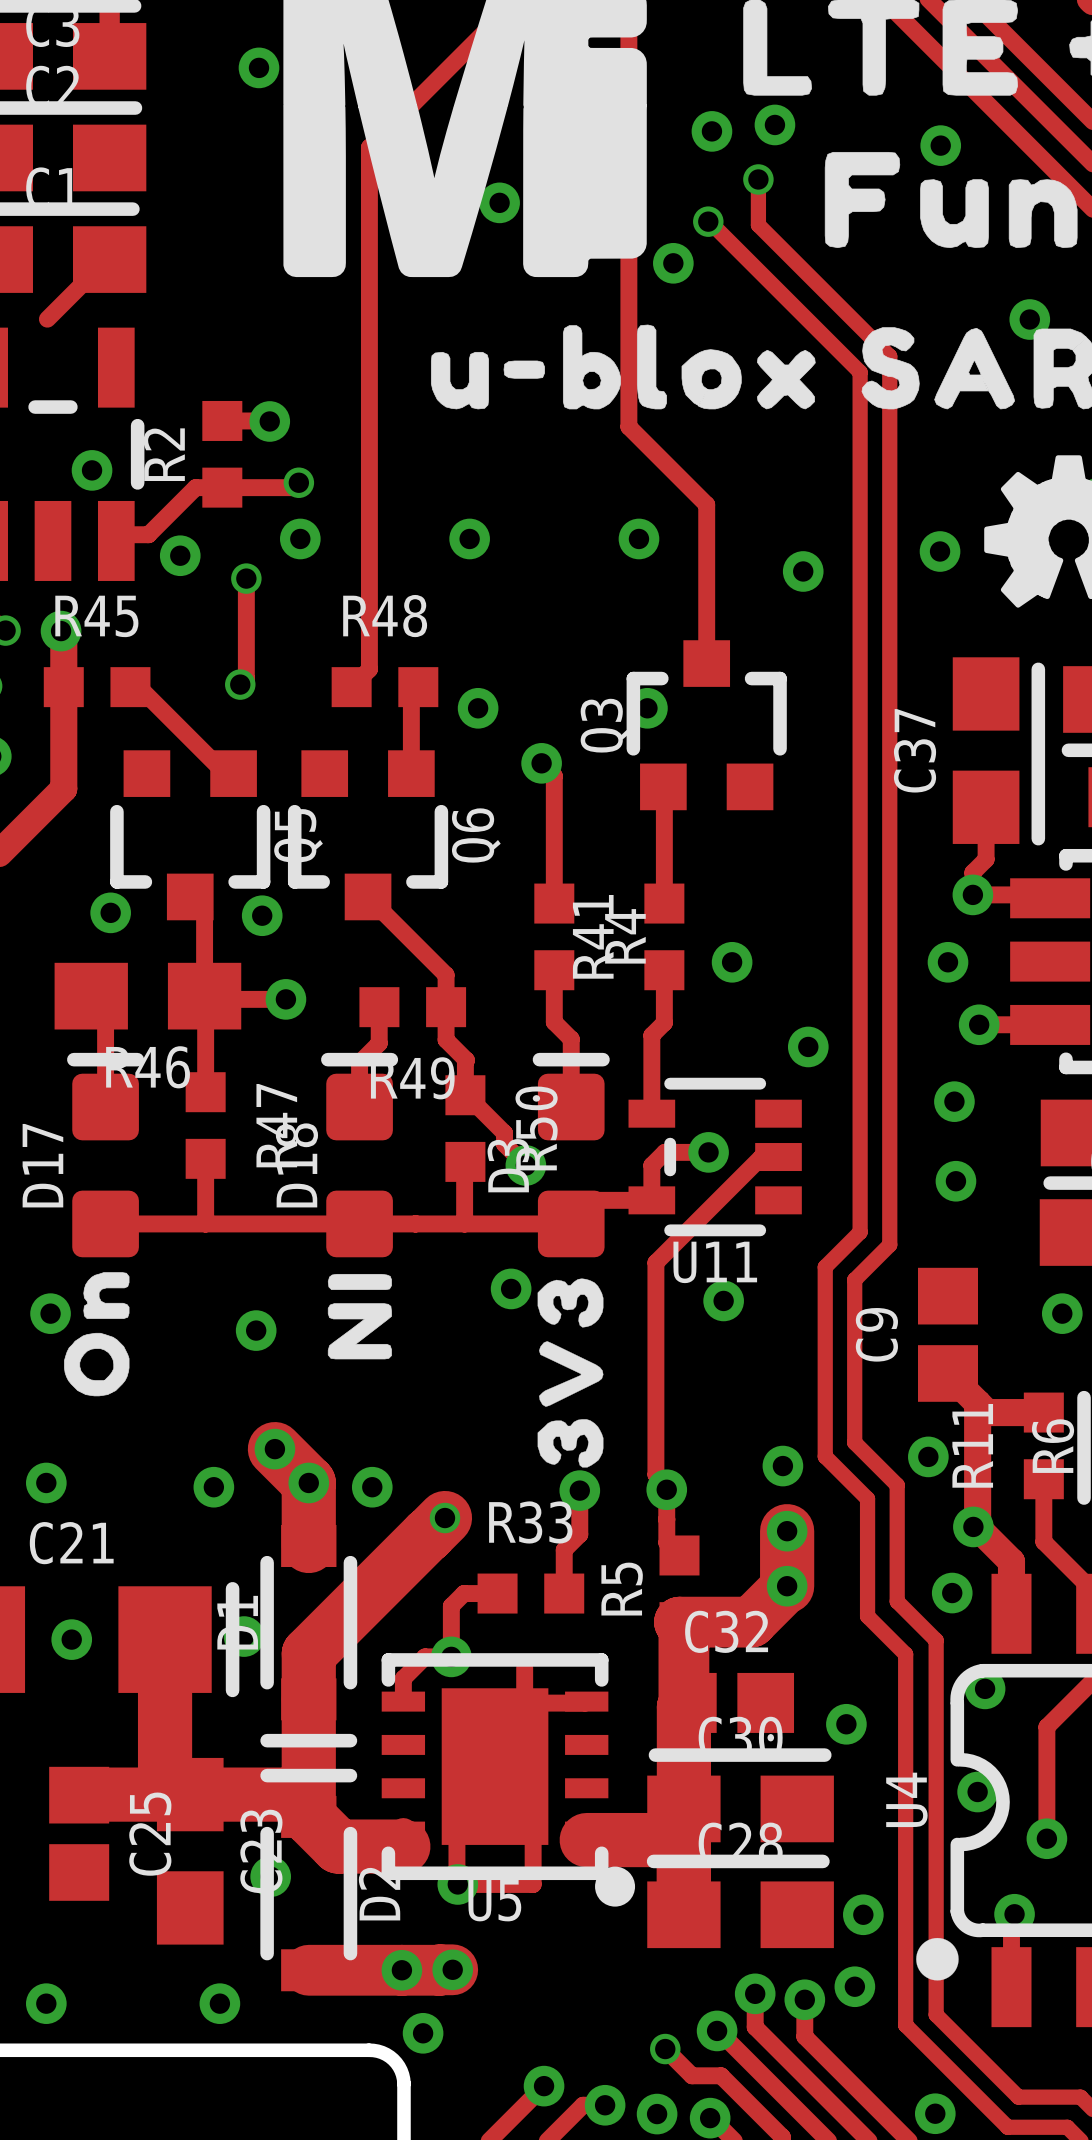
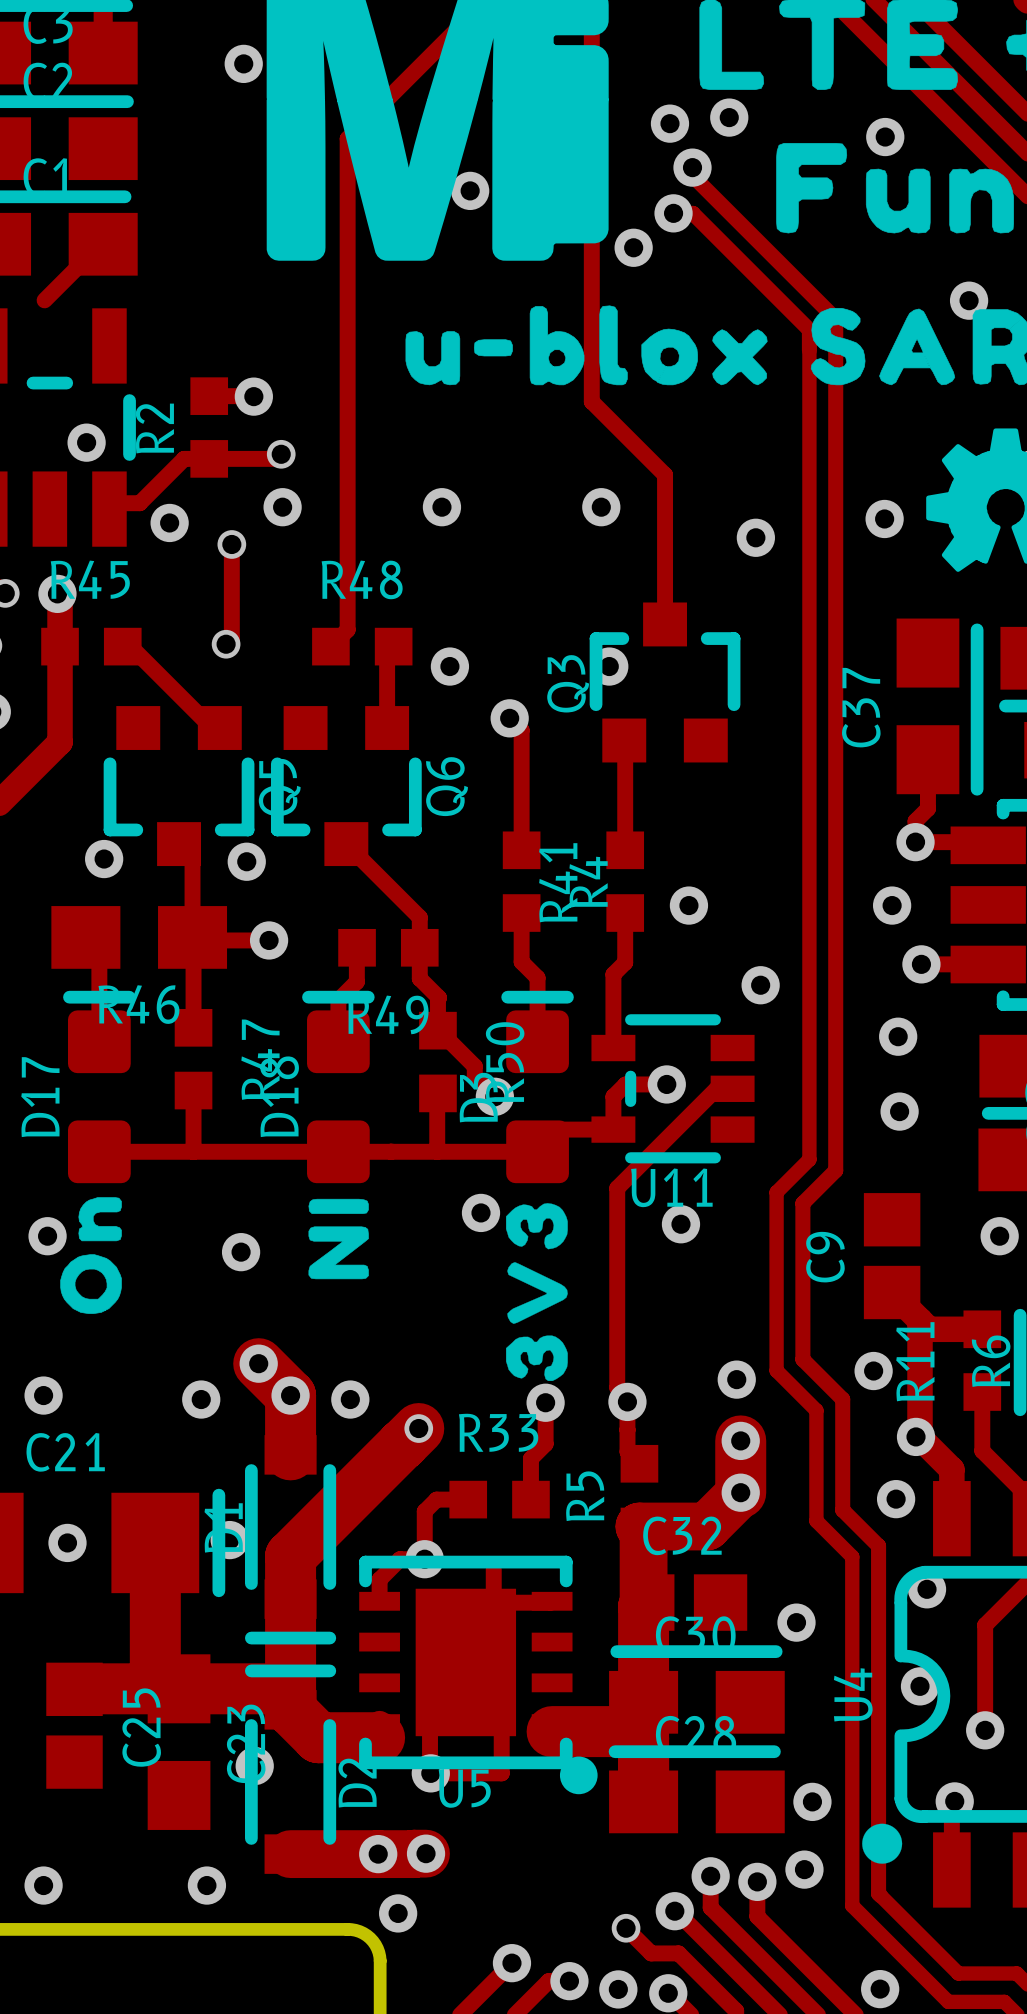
track: (758, 179) (758, 225) (889, 356) (889, 1244) (854, 1279) (854, 1442) (897, 1485) (897, 1601) (936, 1640) (936, 2014) -> (692, 167) (692, 175) (835, 318) (835, 1170) (802, 1203) (802, 1359) (842, 1399) (842, 1510) (878, 1545) (878, 1893) (880, 1896)
via position: (758, 179) -> (692, 167)
via size: [693, 206, 724, 237] -> [654, 194, 693, 233]
track: (709, 221) (860, 372) -> (673, 213) (692, 213) (809, 329) (809, 350)

